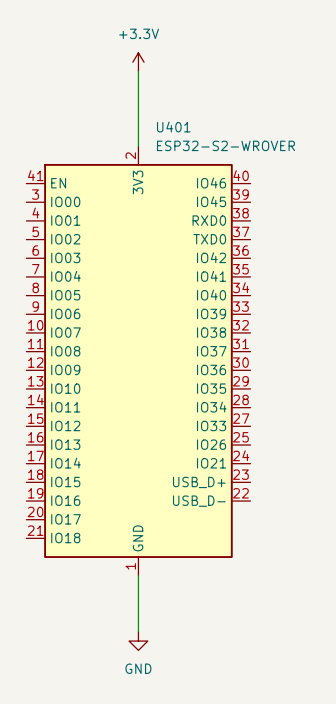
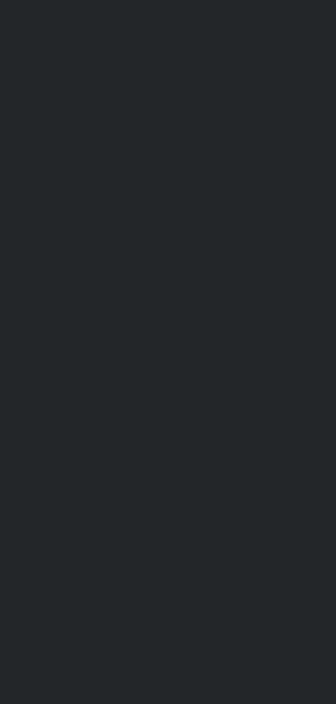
power symbol: +3.3V (138, 62) -> none
wire: (138, 71) (138, 146) -> none
U401: ESP32-S2-WROVER (138, 360) -> none
wire: (138, 575) (138, 631) -> none
power symbol: GND (138, 641) -> none

